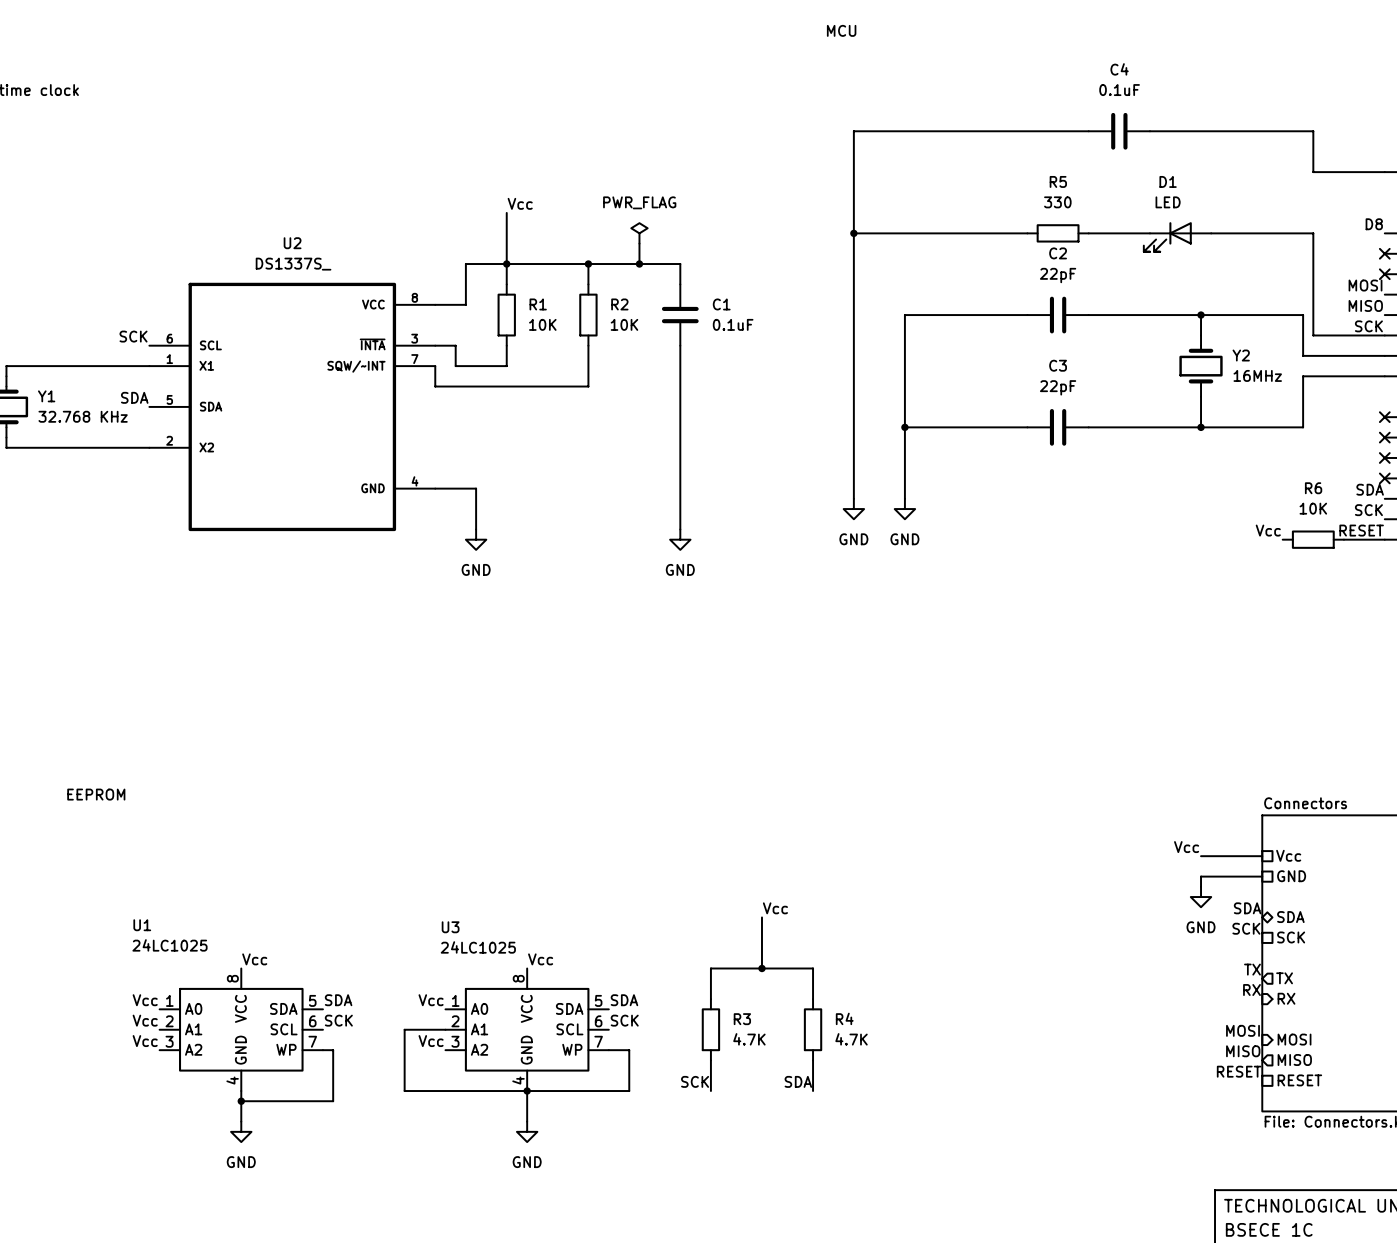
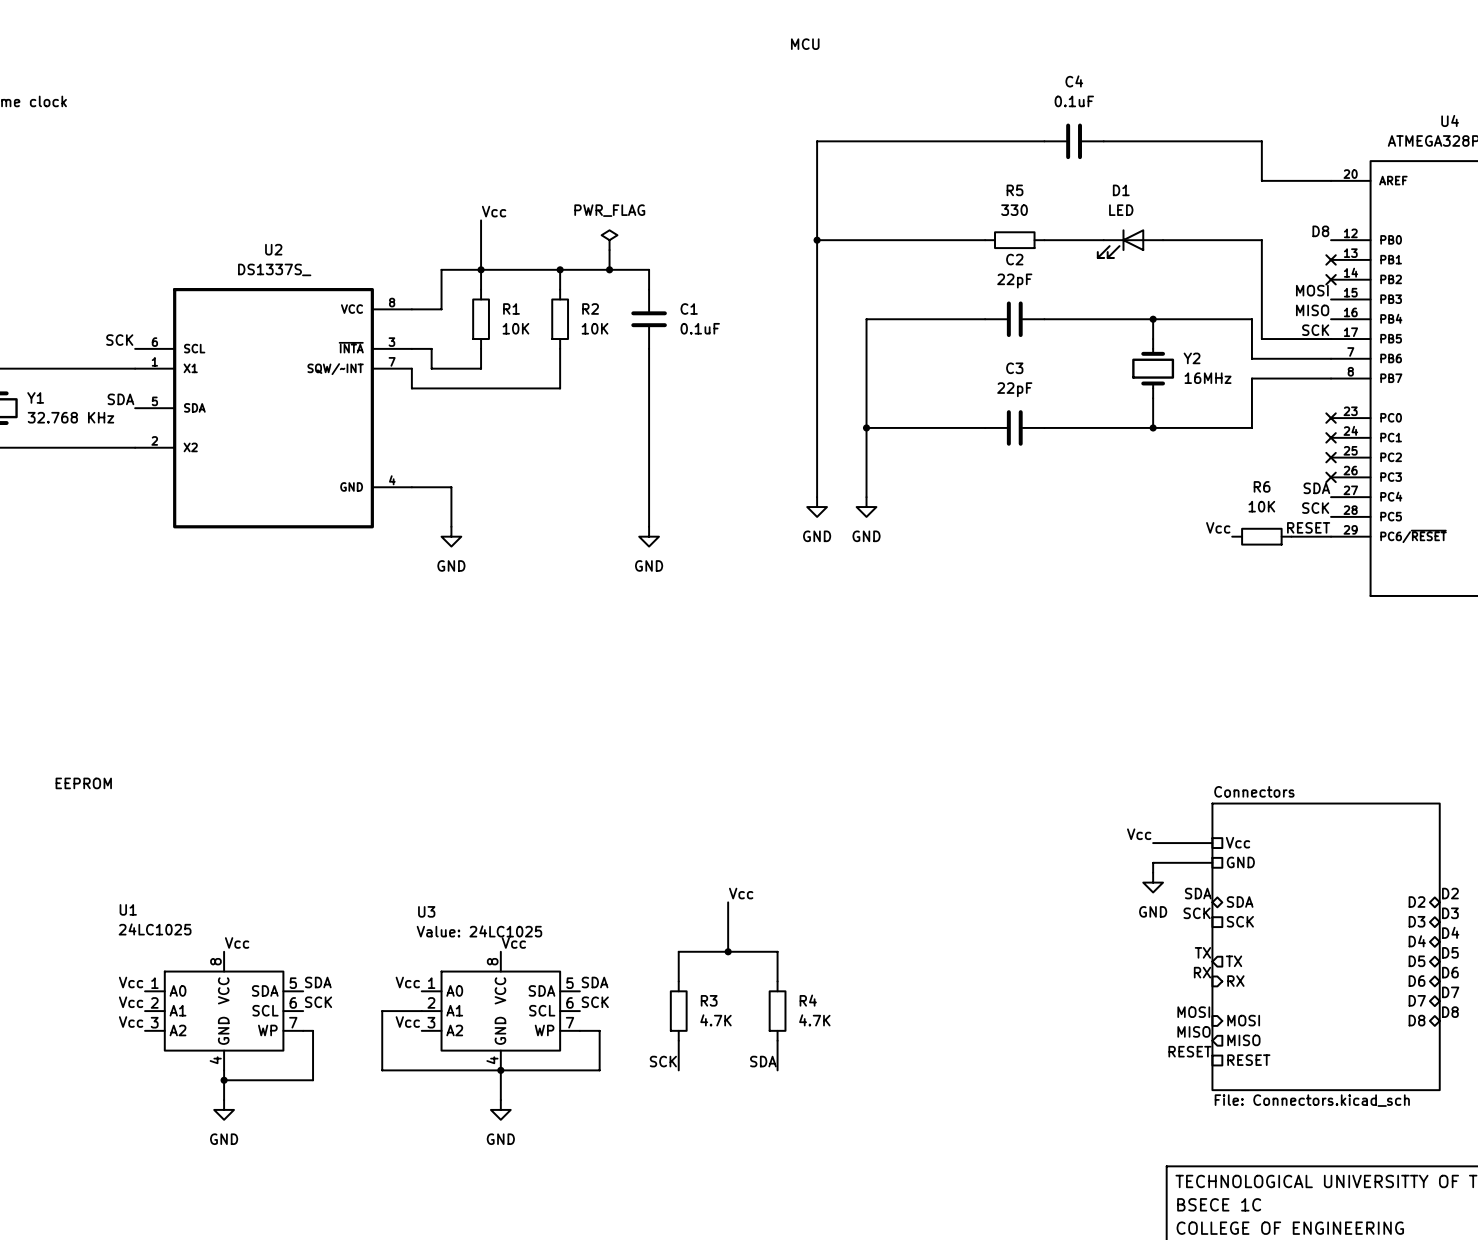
U3 value: 24LC1025 (478, 947) -> Value: 24LC1025 (479, 931)

